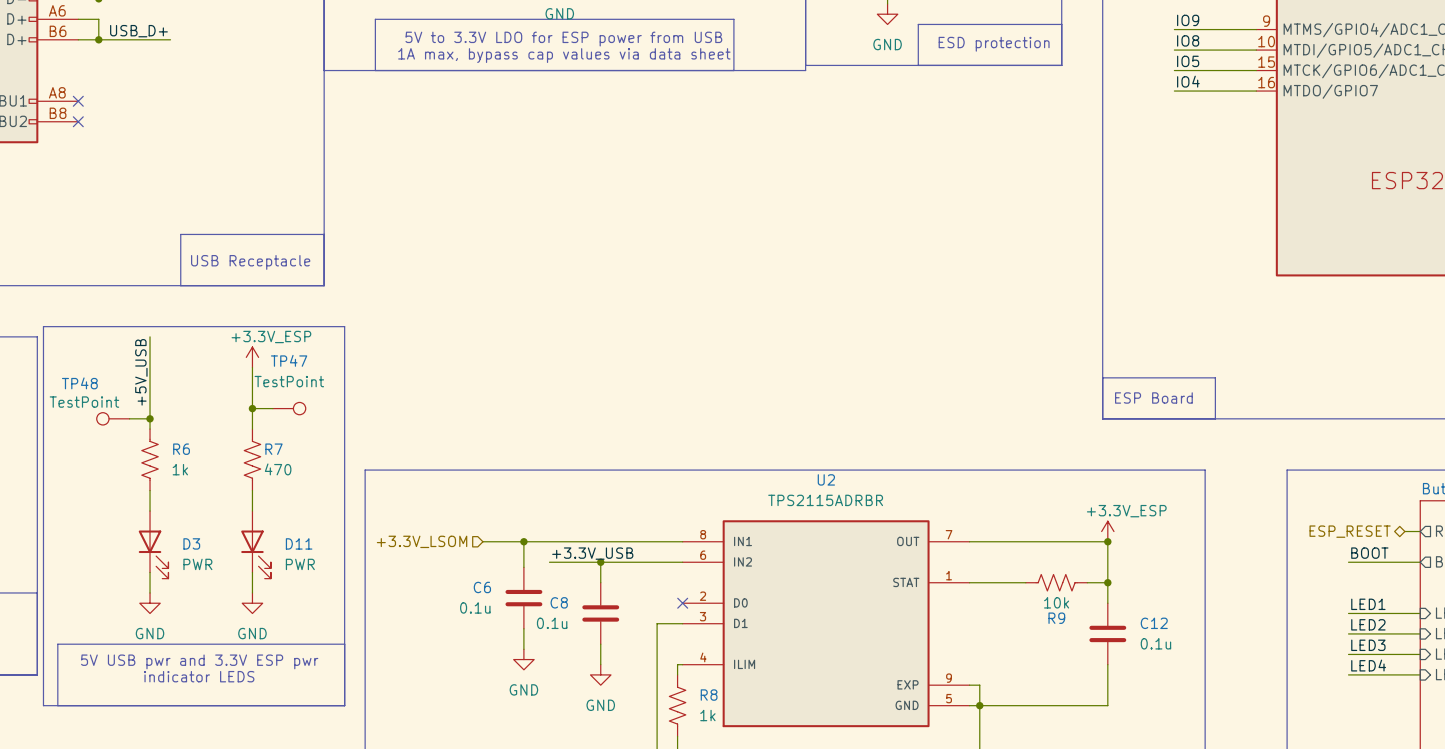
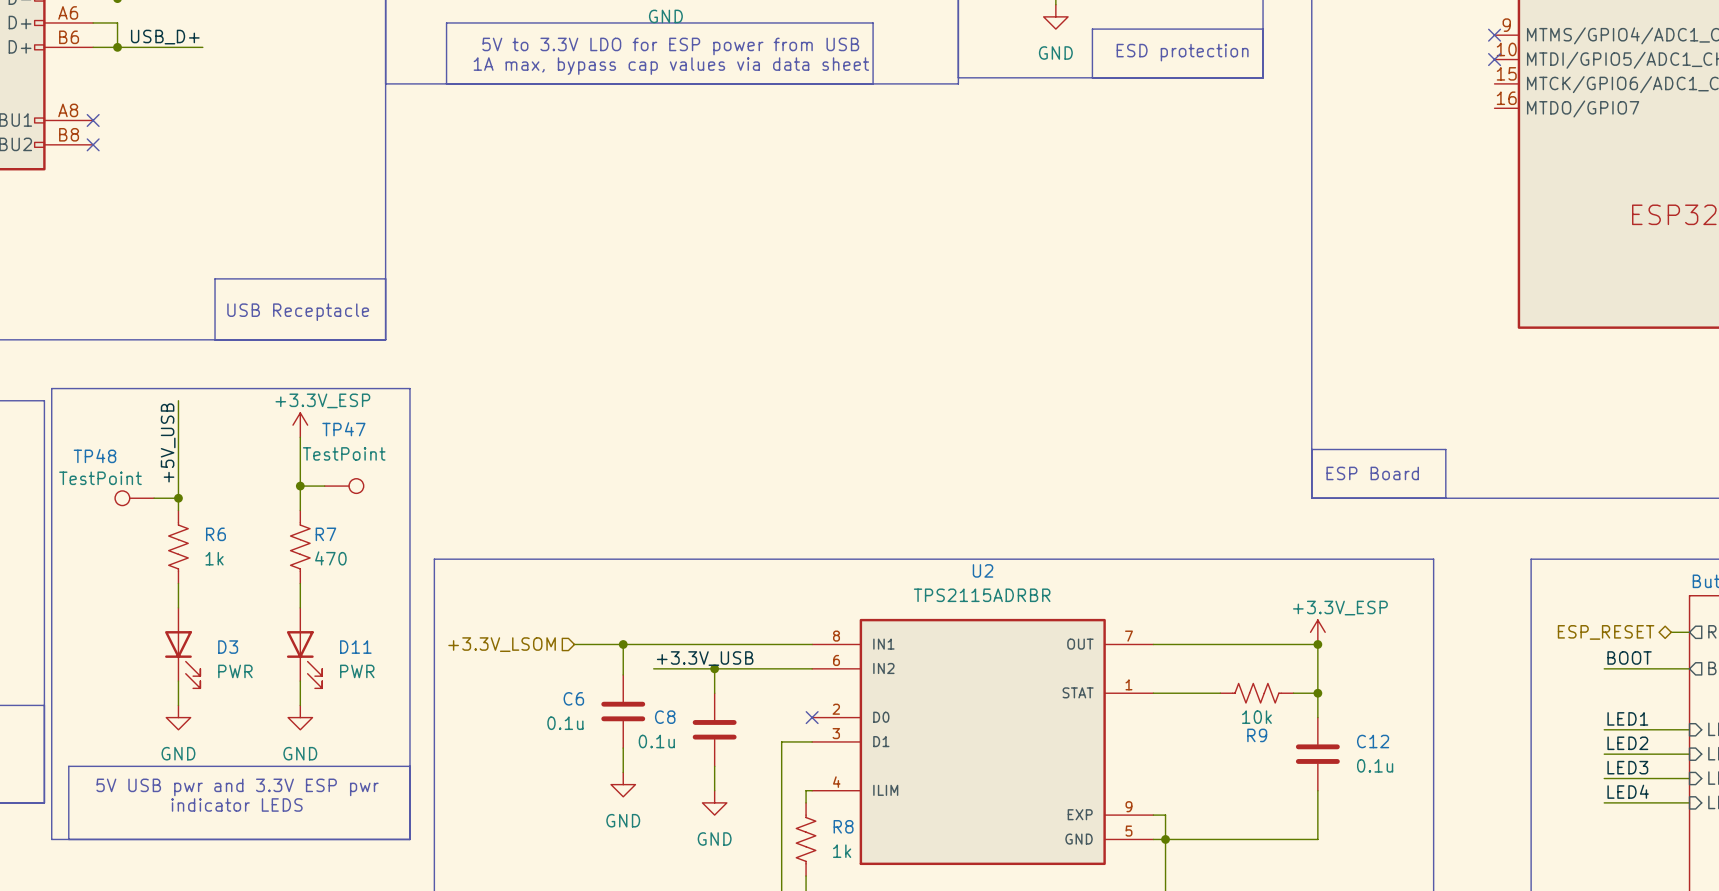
label: IO9 (1188, 20) -> none
wire: (1174, 29) (1256, 29) -> none
no-connect mark: none -> (1494, 35)
label: IO8 (1188, 40) -> none
wire: (1174, 50) (1256, 50) -> none
no-connect mark: none -> (1494, 59)
label: IO5 (1188, 61) -> none
wire: (1174, 70) (1256, 70) -> none
label: IO4 (1188, 81) -> none
wire: (1174, 91) (1256, 91) -> none

